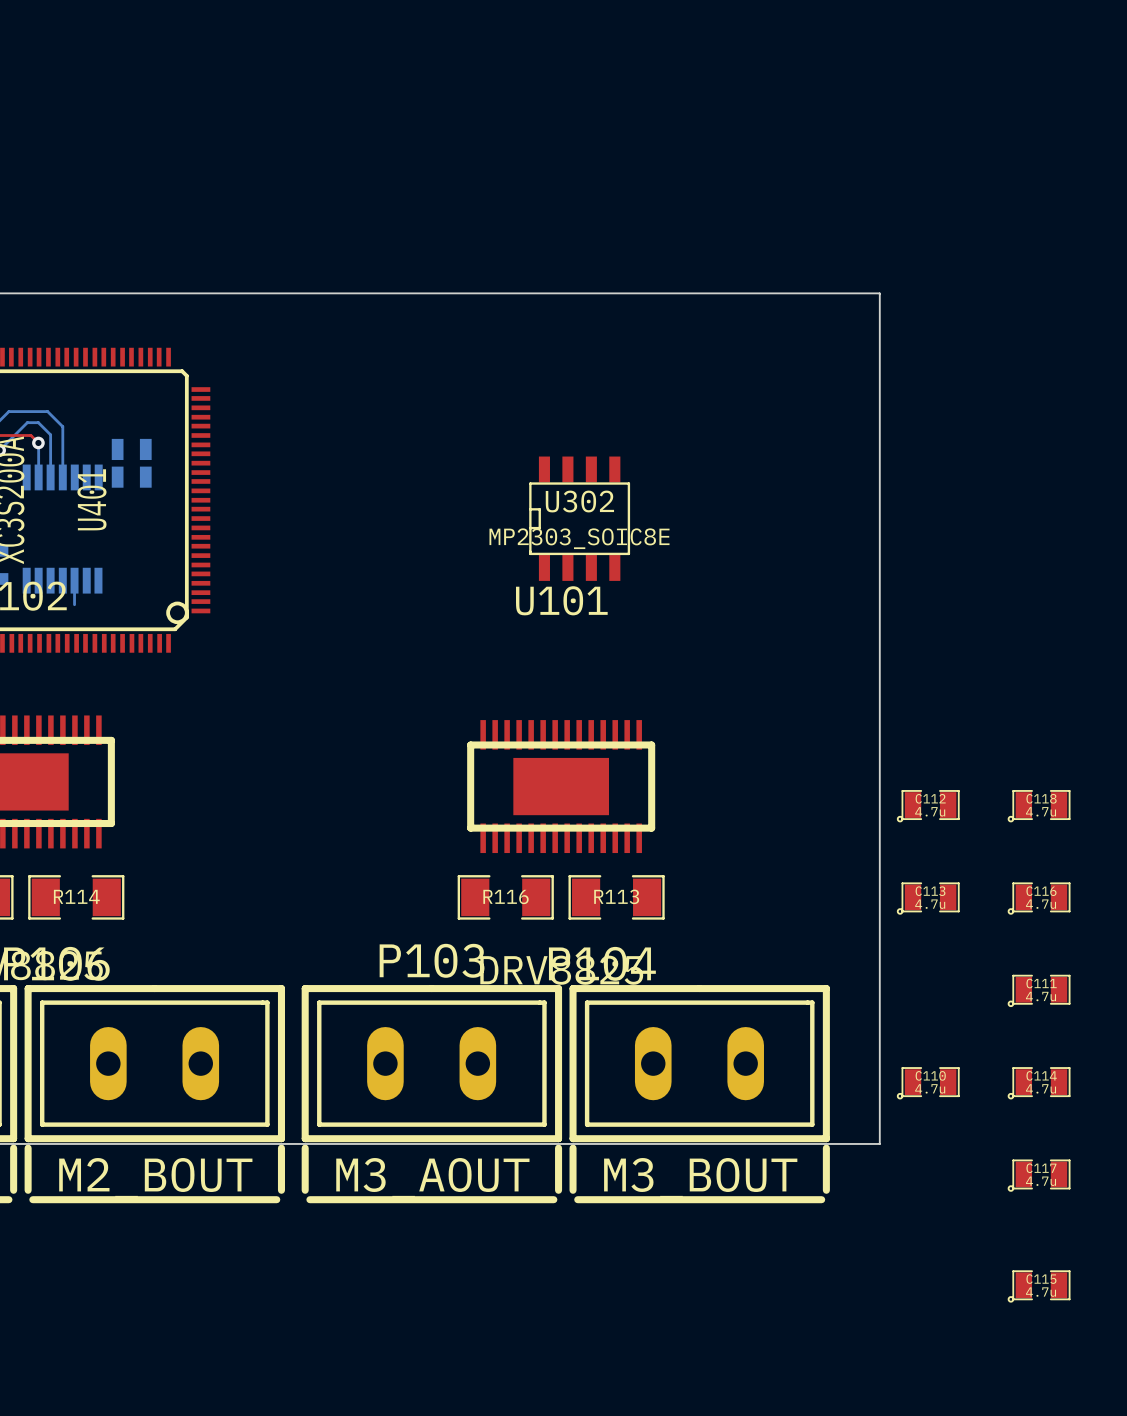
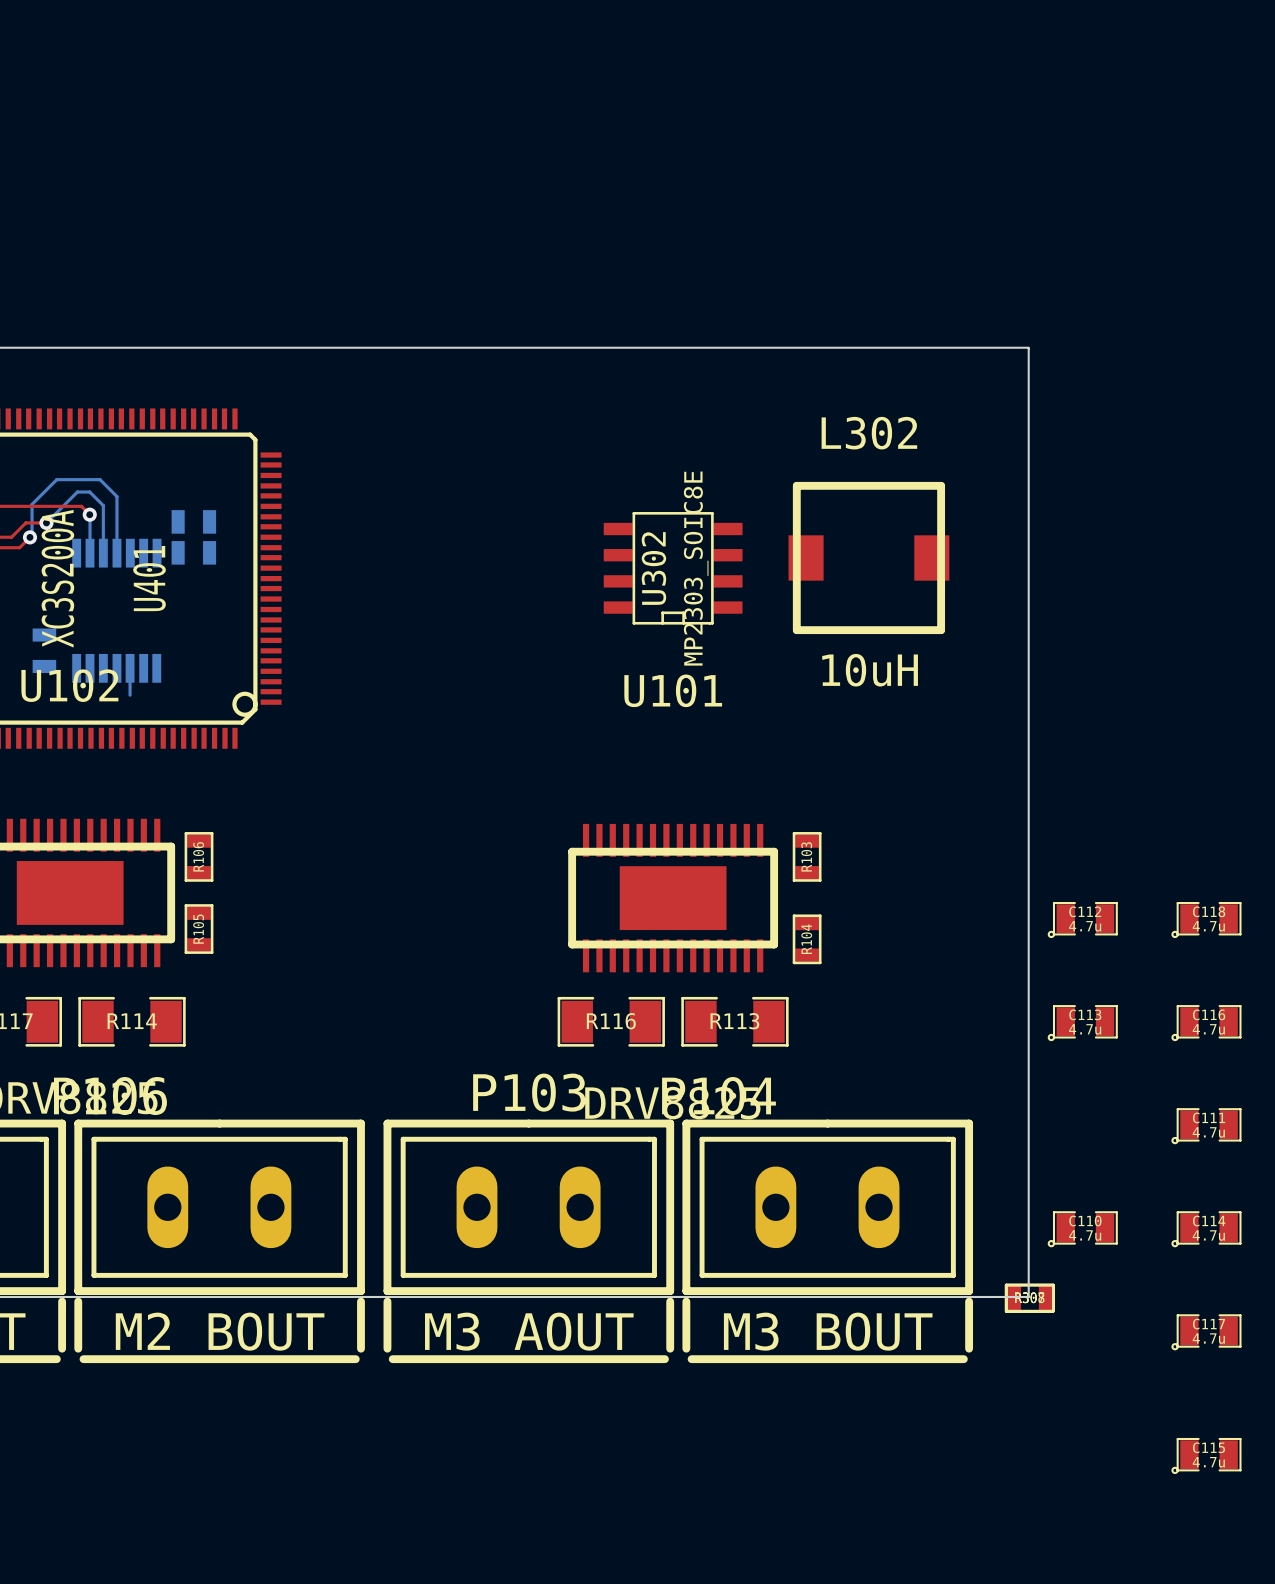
L302: none -> 10uH (868, 557)
U302 rotation: 0° (579, 518) -> 90° counterclockwise (673, 568)
R106: none -> (199, 856)
R103: none -> (807, 856)
R105: none -> (199, 929)
R104: none -> (807, 939)
part: none -> (1029, 1298)
part: none -> (1029, 1298)

